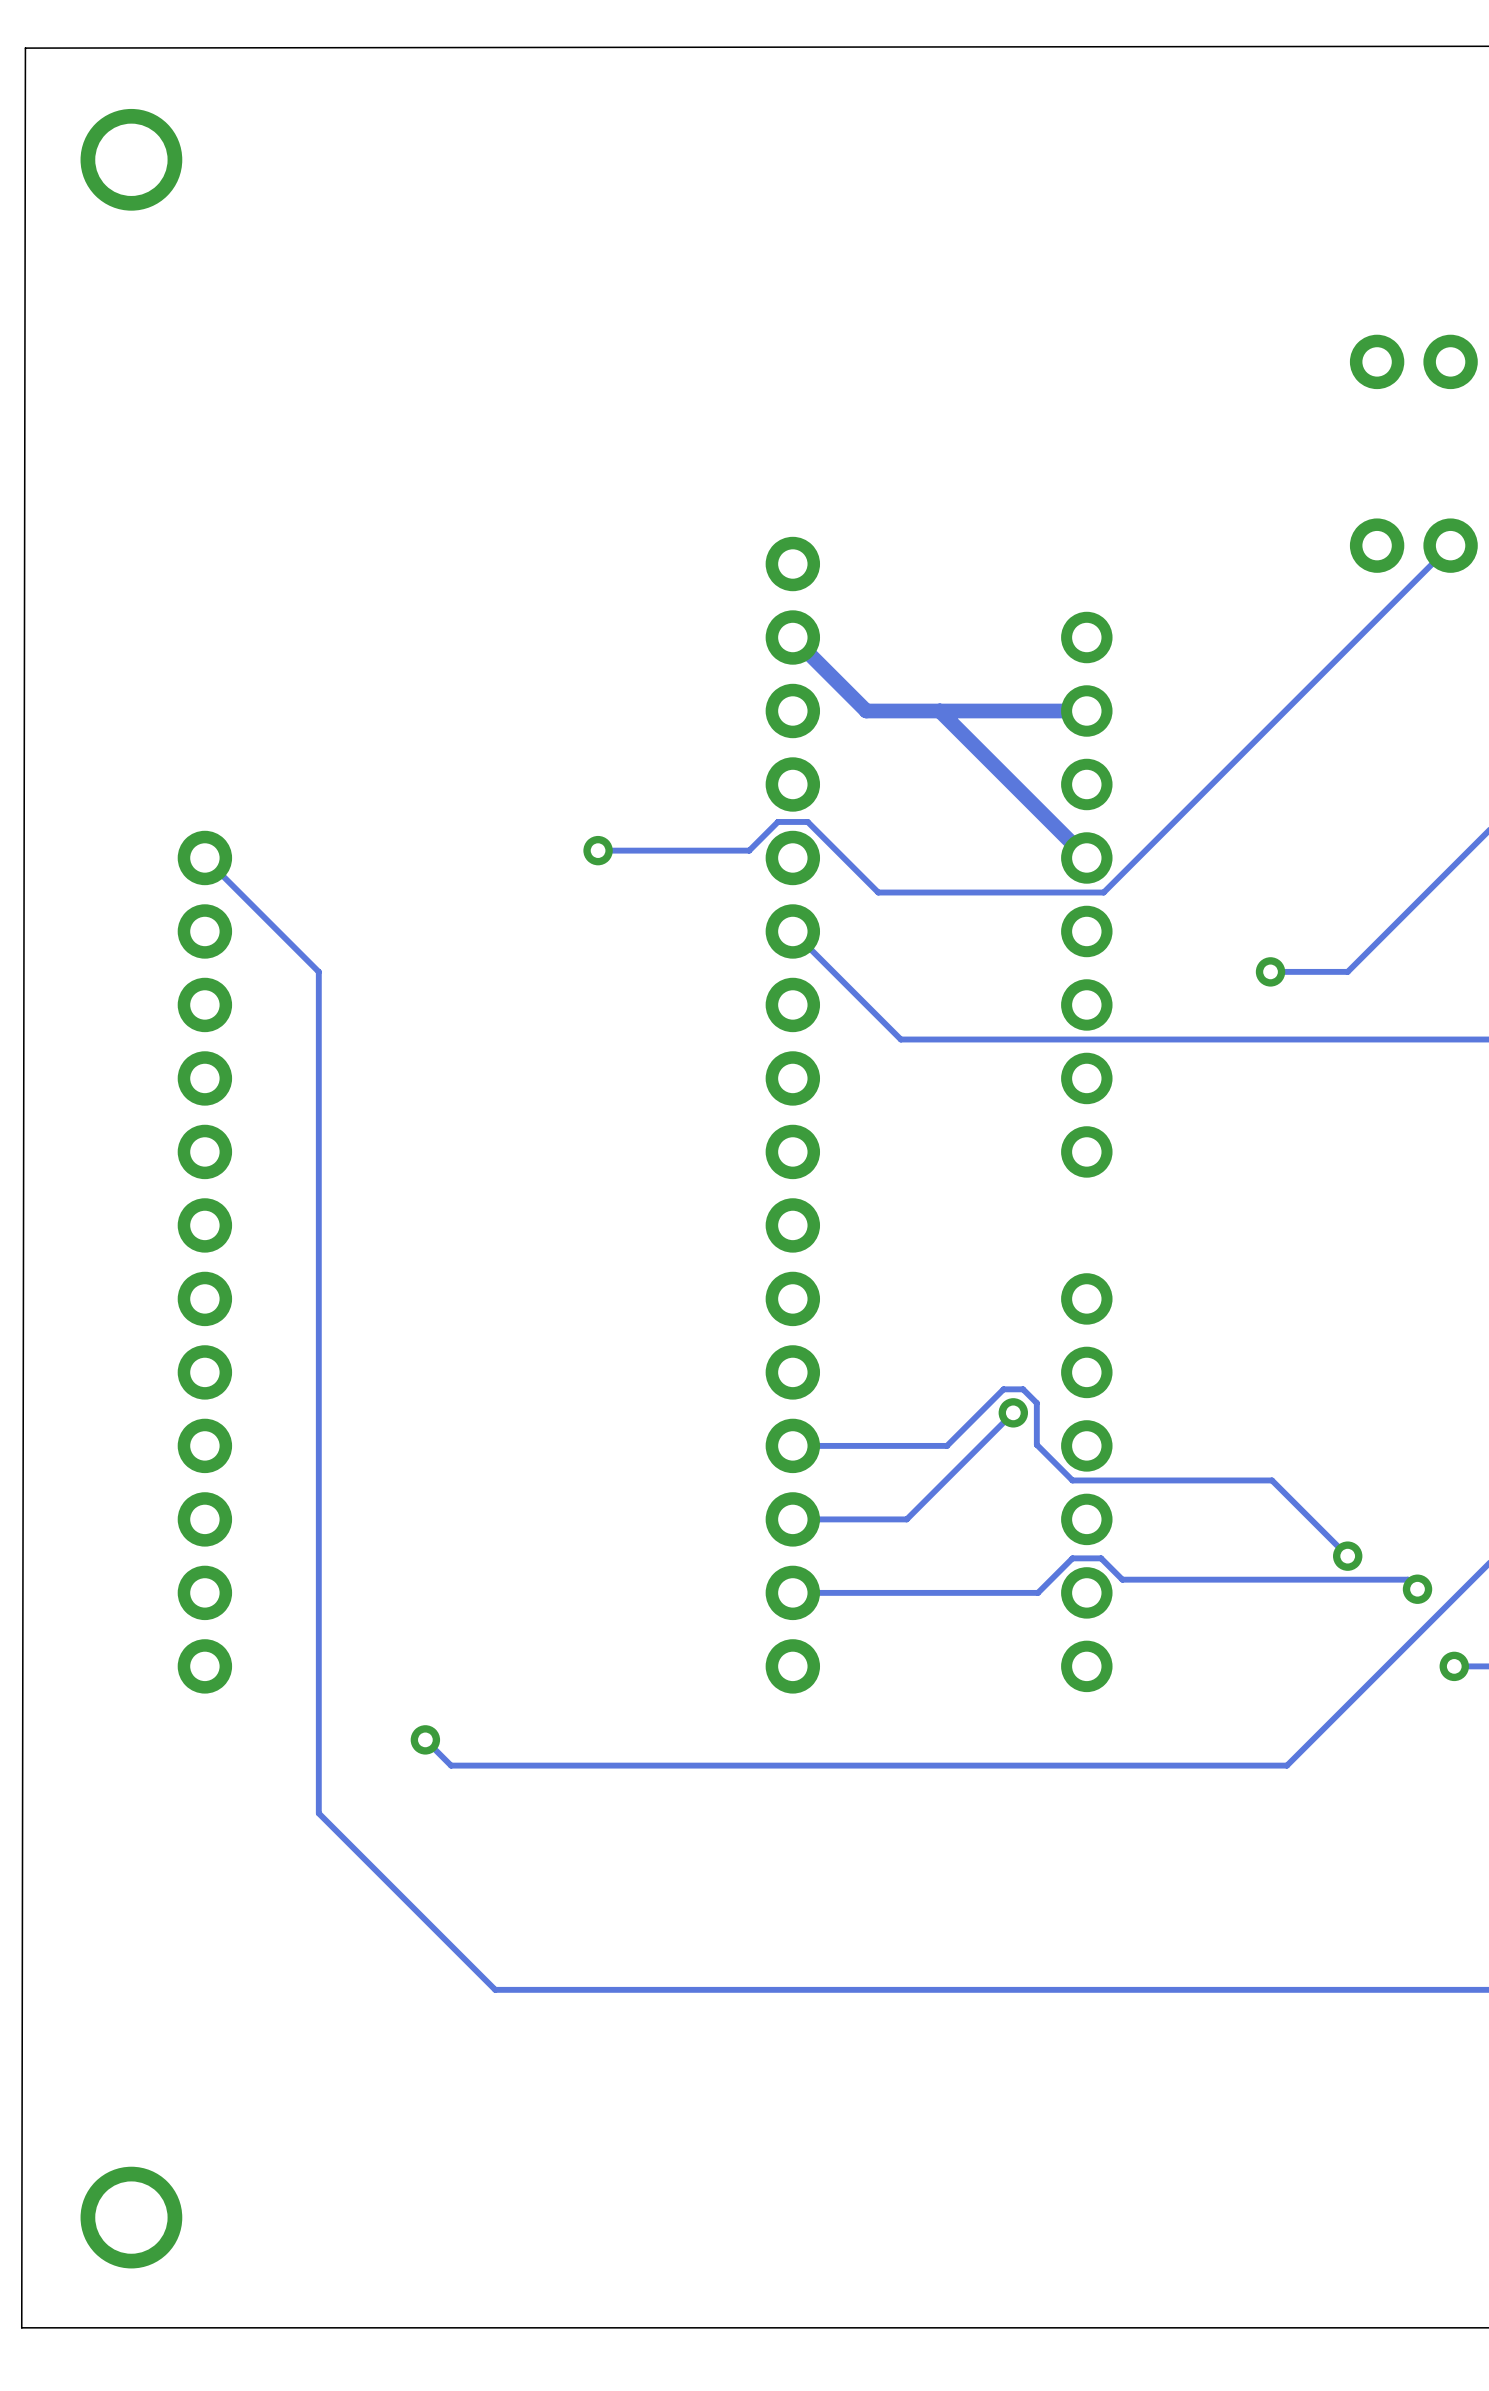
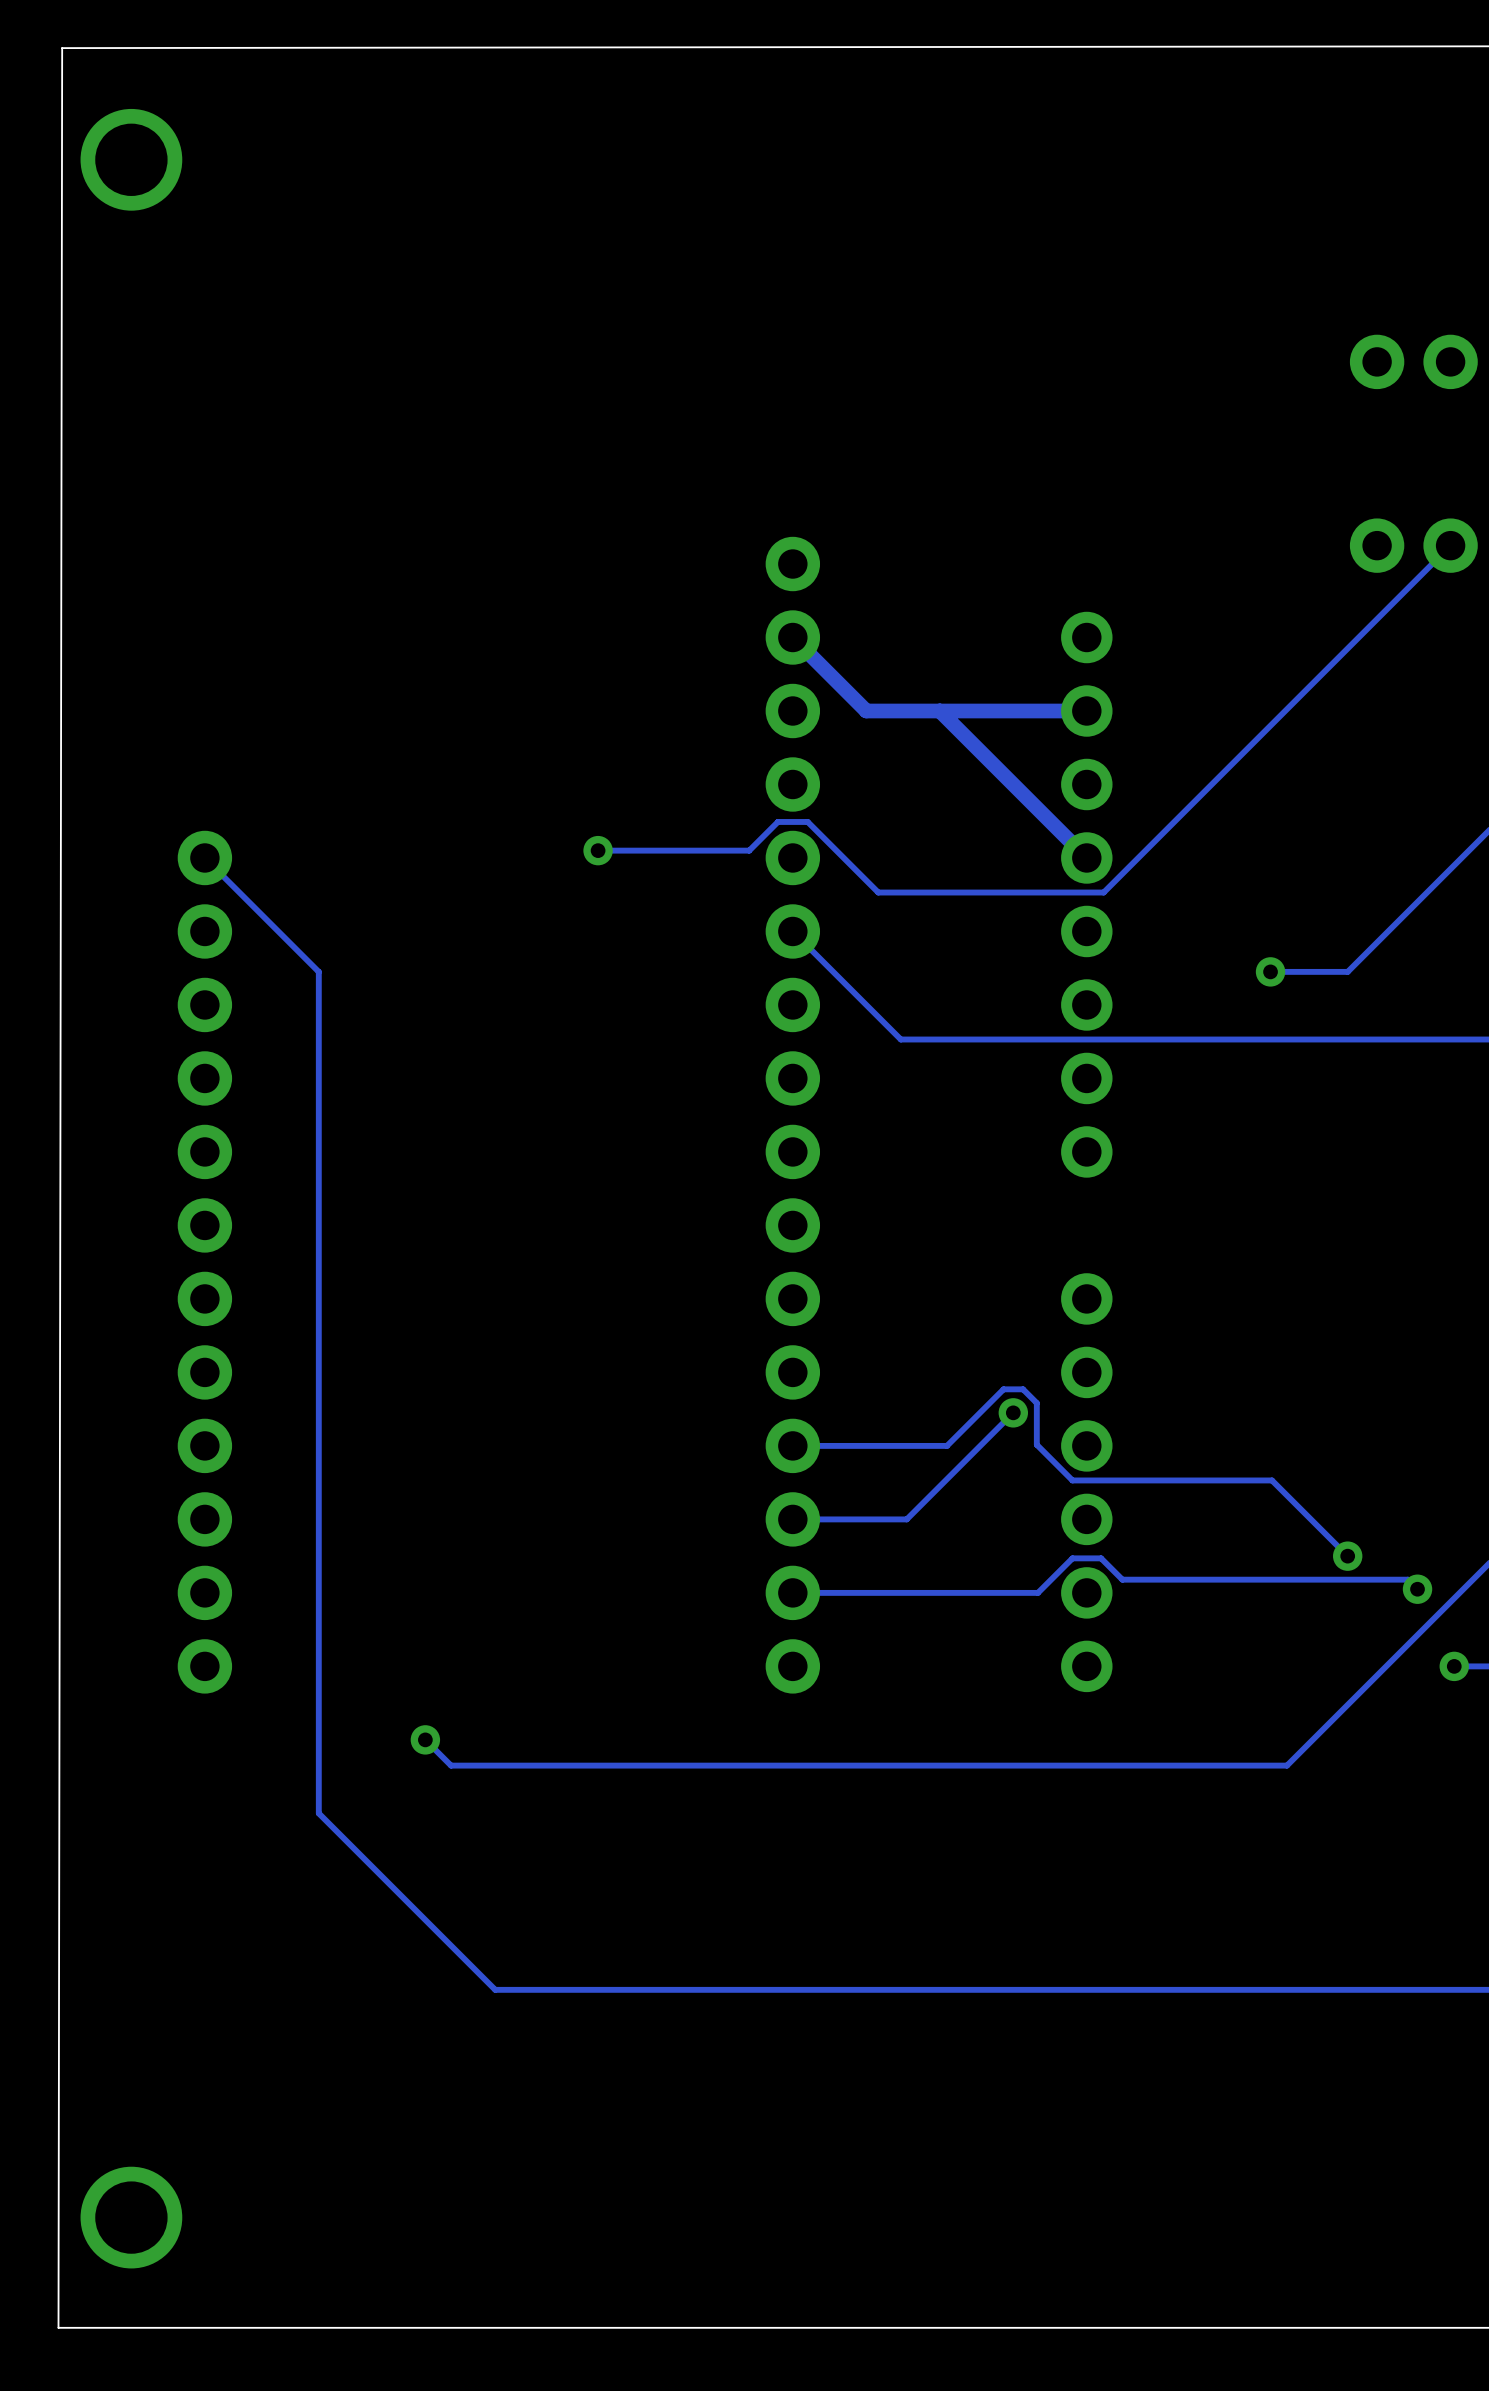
board edge: (62, 48) (25, 48) (21, 2327) (58, 2327) -> (62, 48) (58, 2327)

